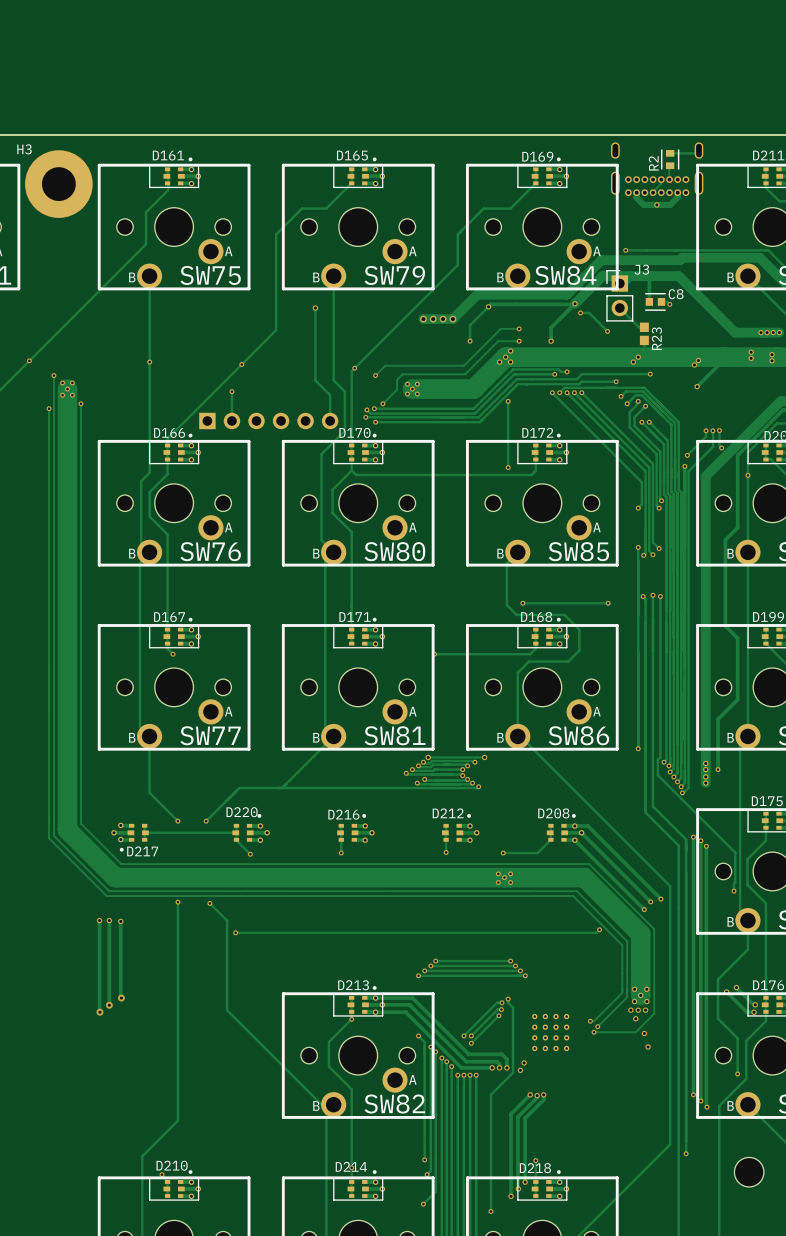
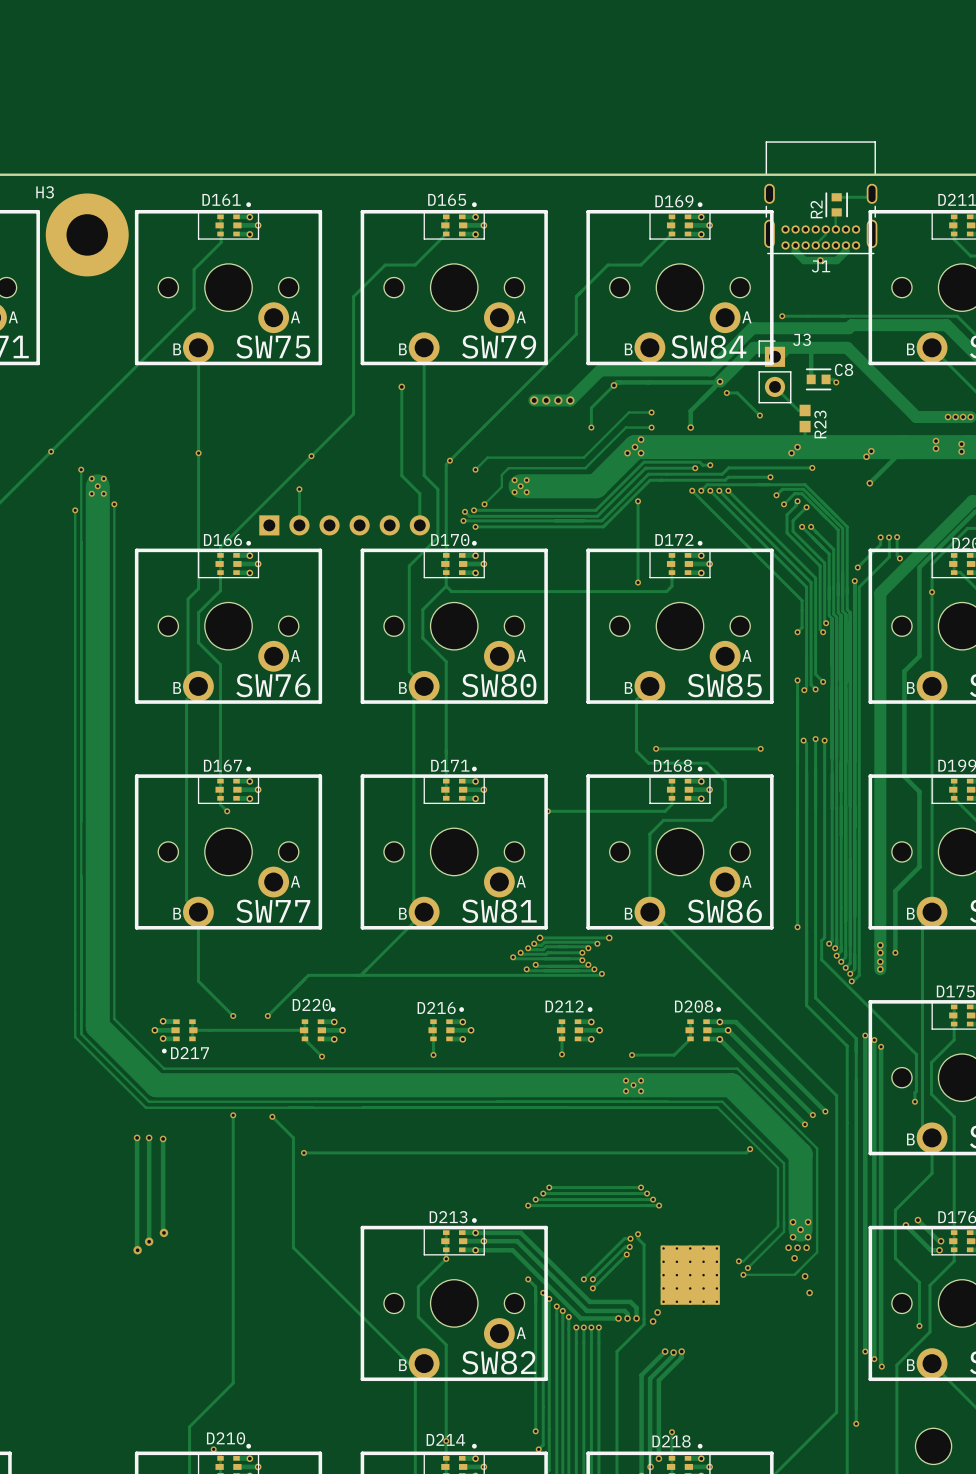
J1: none -> (820, 197)
part: (657, 169) -> none
part footprint: [532, 1013, 570, 1052] -> [660, 1245, 720, 1305]

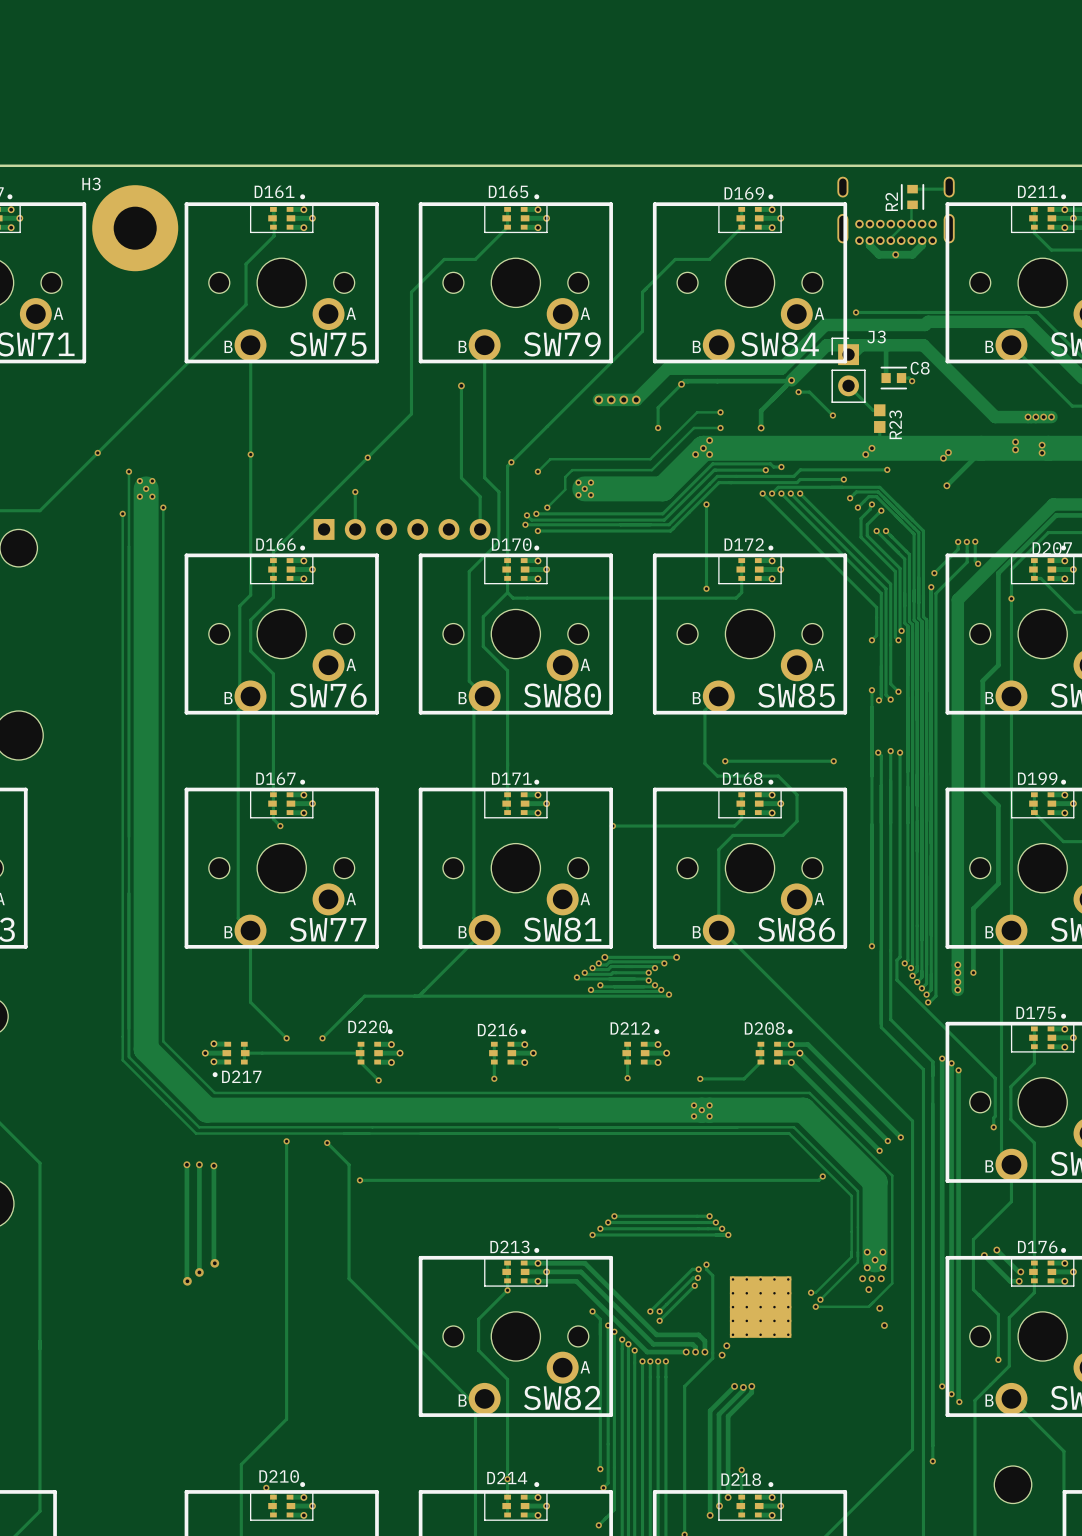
J1 side: top (820, 197) -> bottom (896, 210)

